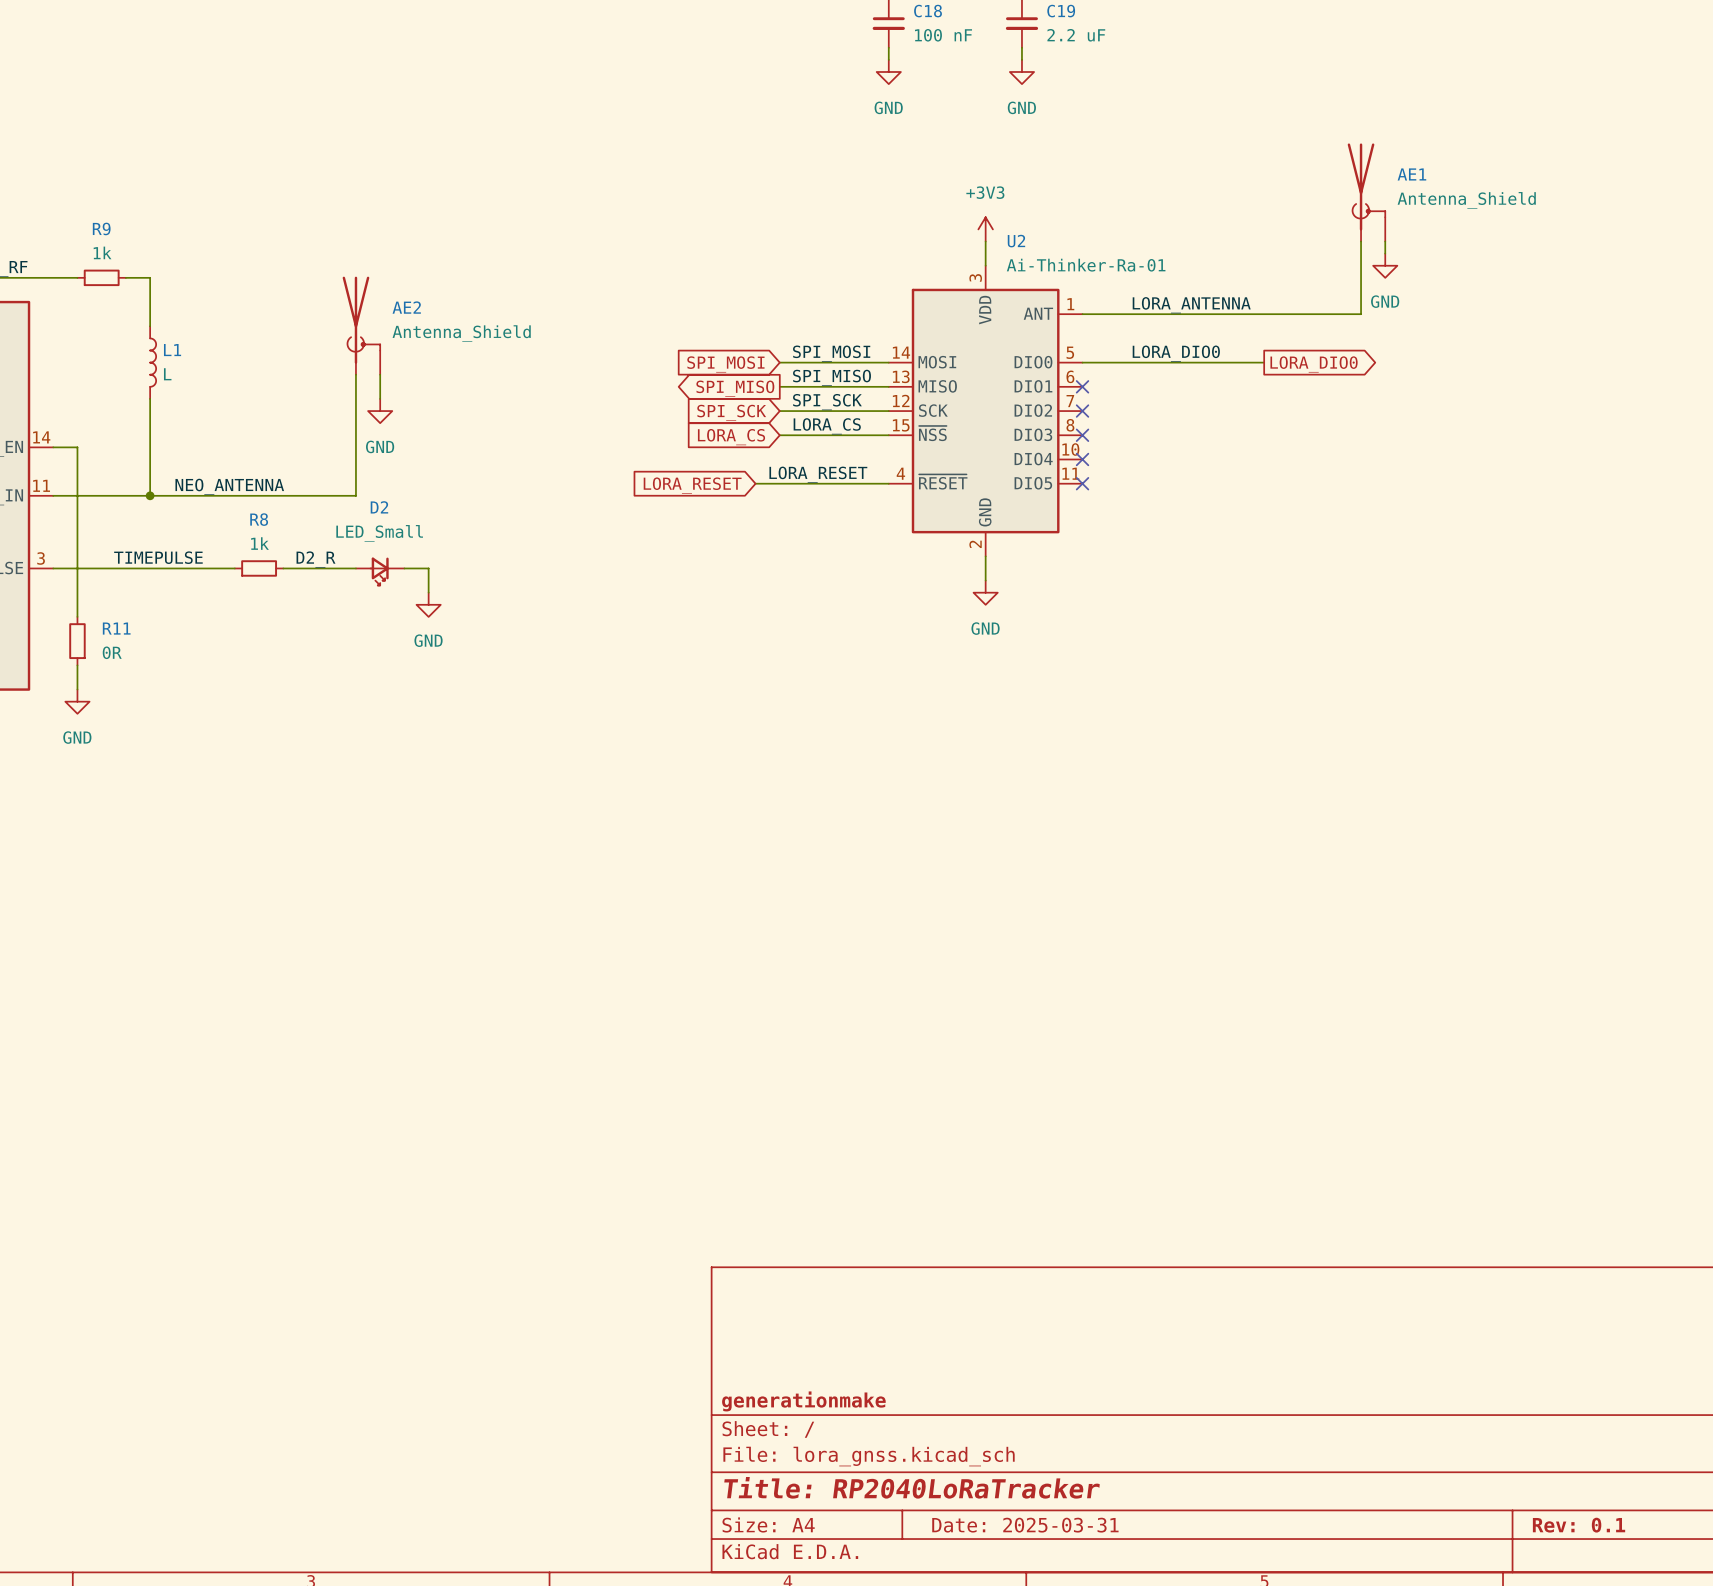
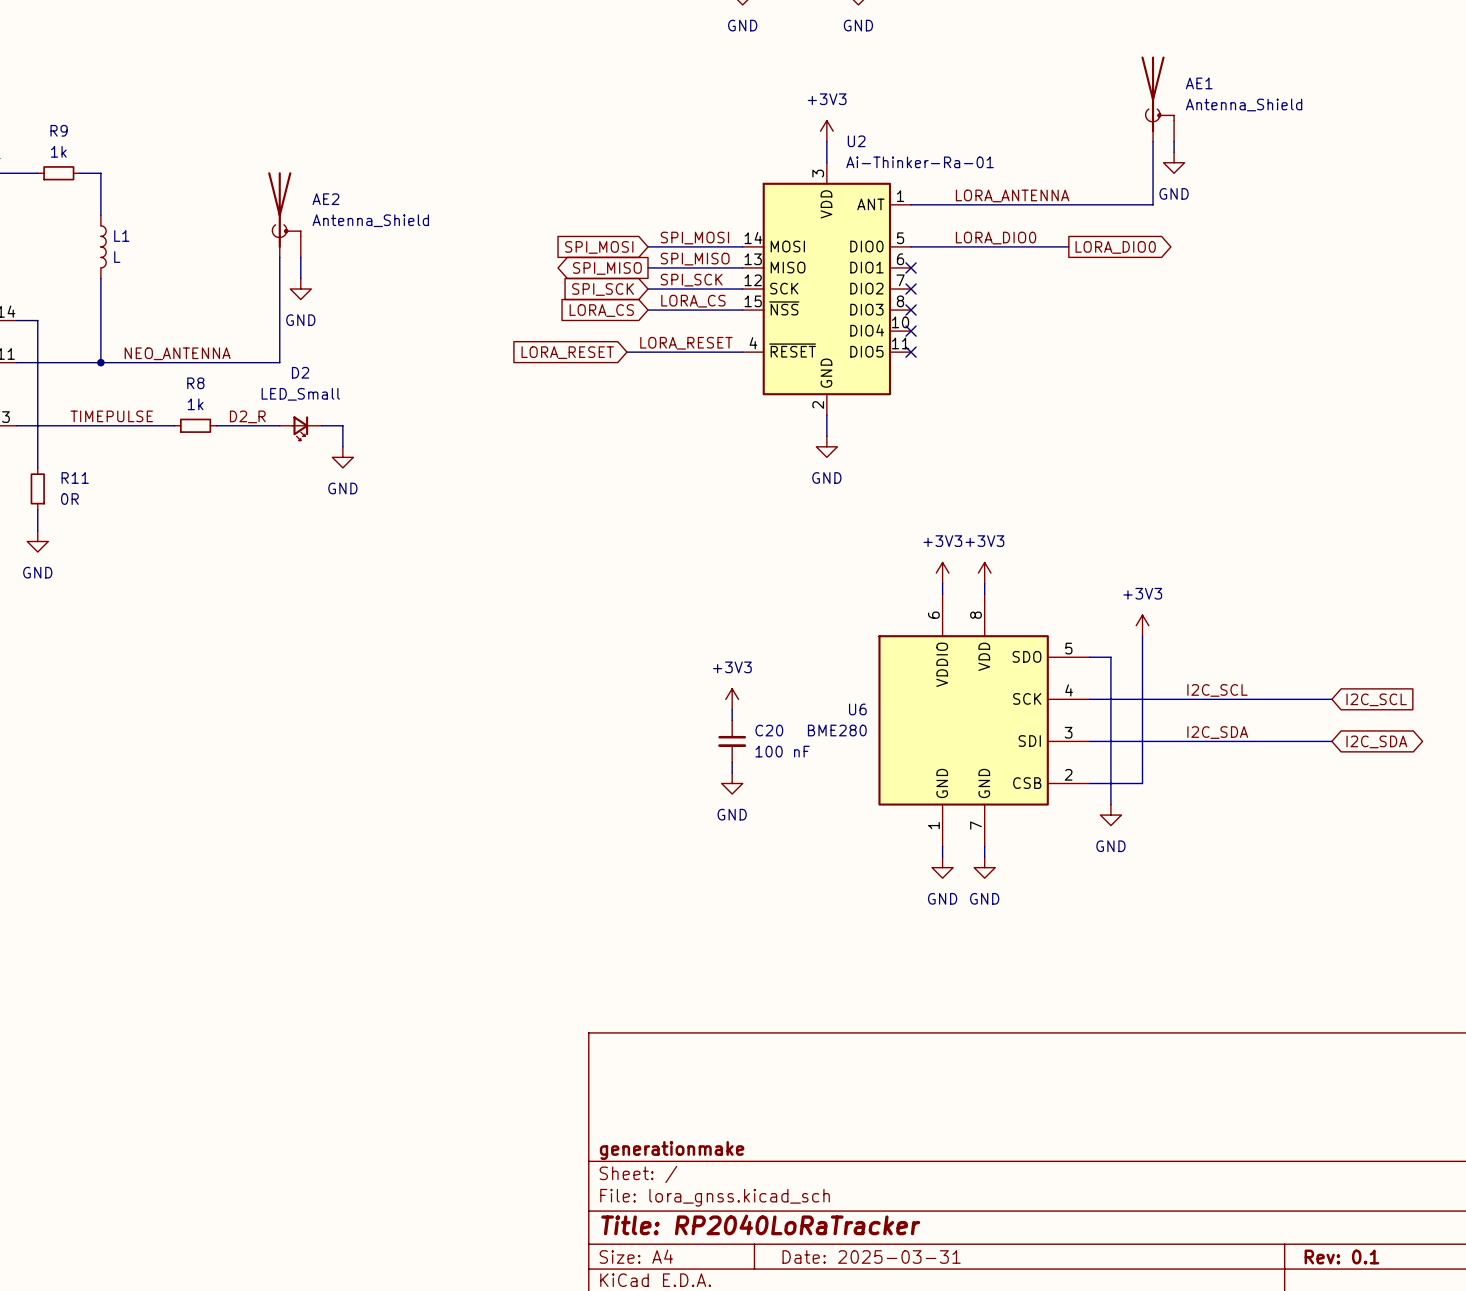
power symbol: none -> +3V3 (942, 573)
power symbol: none -> +3V3 (984, 573)
wire: none -> (942, 583) (942, 594)
wire: none -> (984, 583) (984, 594)
power symbol: none -> +3V3 (1142, 625)
wire: none -> (1142, 636) (1142, 783) (1089, 783)
wire: none -> (1089, 657) (1110, 657) (1110, 804)
label: none -> I2C_SCL (1217, 690)
power symbol: none -> +3V3 (732, 699)
wire: none -> (1089, 699) (1331, 699)
global label: none -> I2C_SCL (1376, 699)
wire: none -> (732, 709) (732, 720)
U6: none -> BME280 (984, 720)
label: none -> I2C_SDA (1217, 732)
C20: none -> 100 nF (732, 741)
wire: none -> (1089, 741) (1331, 741)
global label: none -> I2C_SDA (1376, 741)
wire: none -> (732, 762) (732, 772)
power symbol: none -> GND (732, 783)
power symbol: none -> GND (1110, 815)
wire: none -> (942, 846) (942, 857)
wire: none -> (984, 846) (984, 857)
power symbol: none -> GND (942, 867)
power symbol: none -> GND (984, 867)

